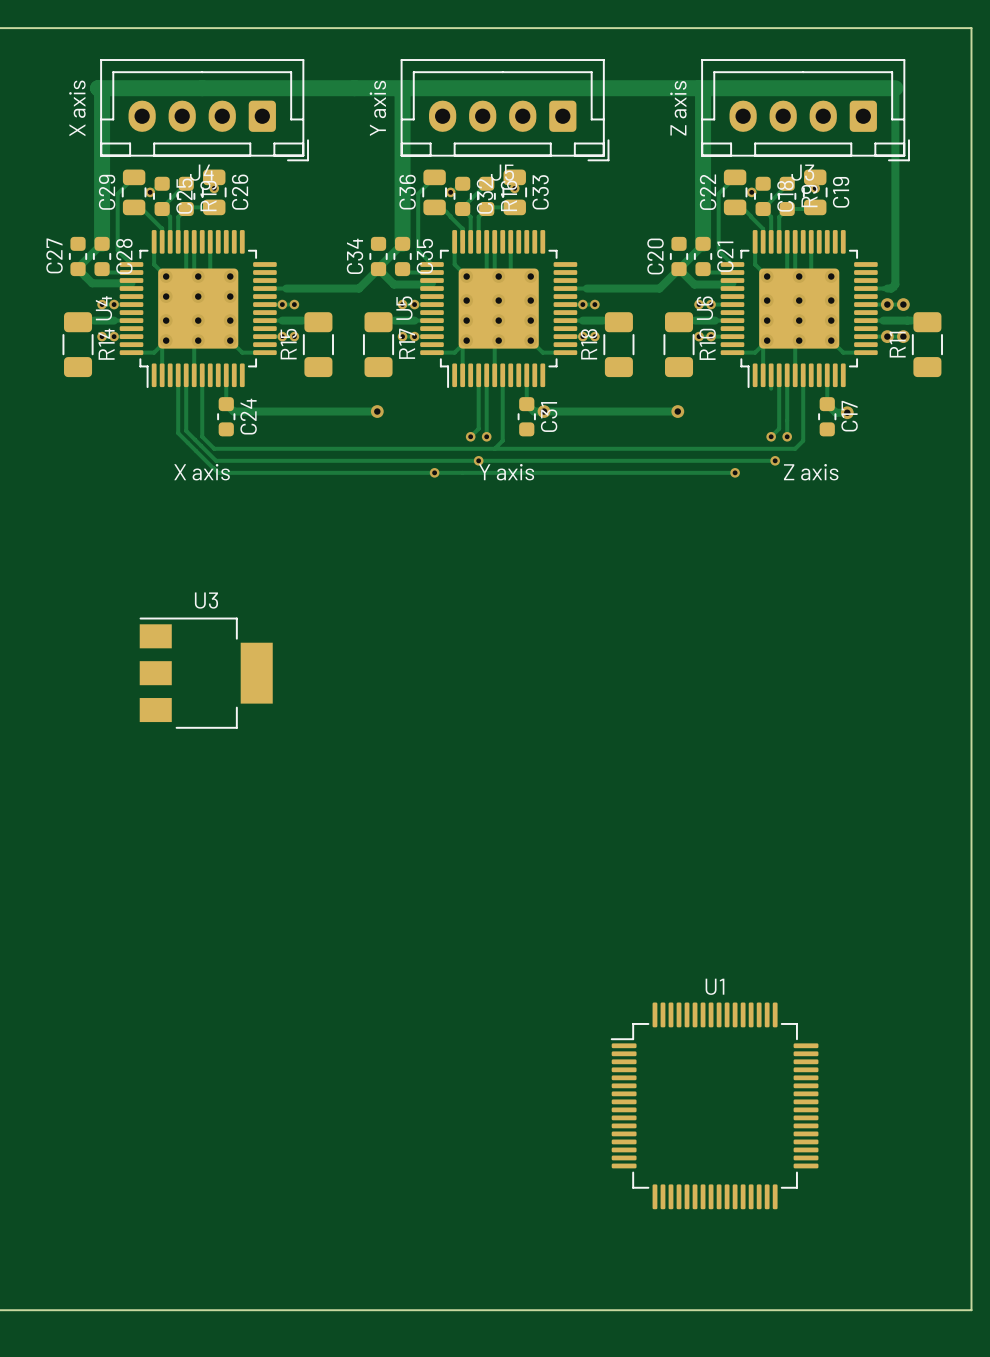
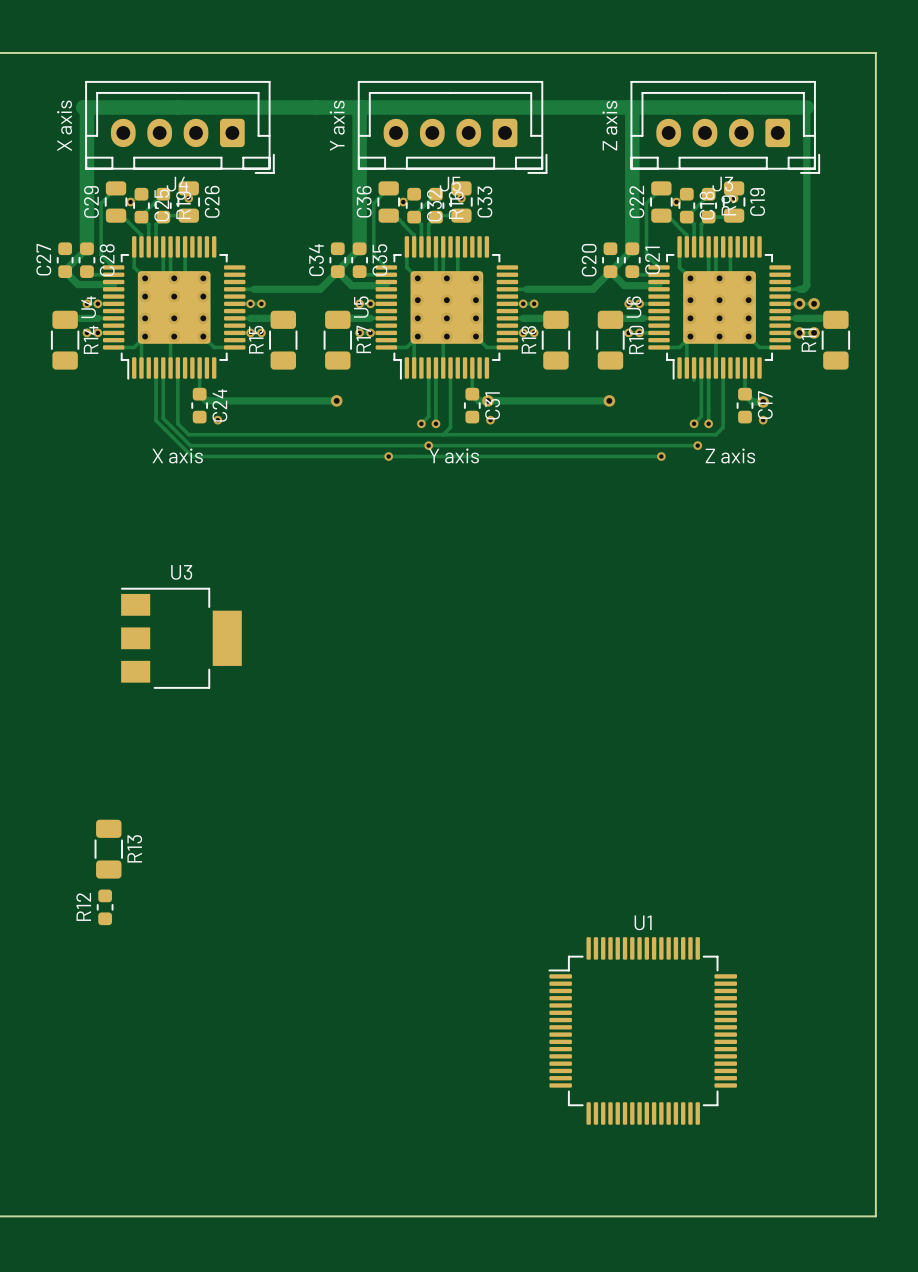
via: none -> (217, 420)
via: none -> (490, 420)
via: none -> (763, 420)
R13: none -> (108, 849)
R12: none -> (105, 907)

